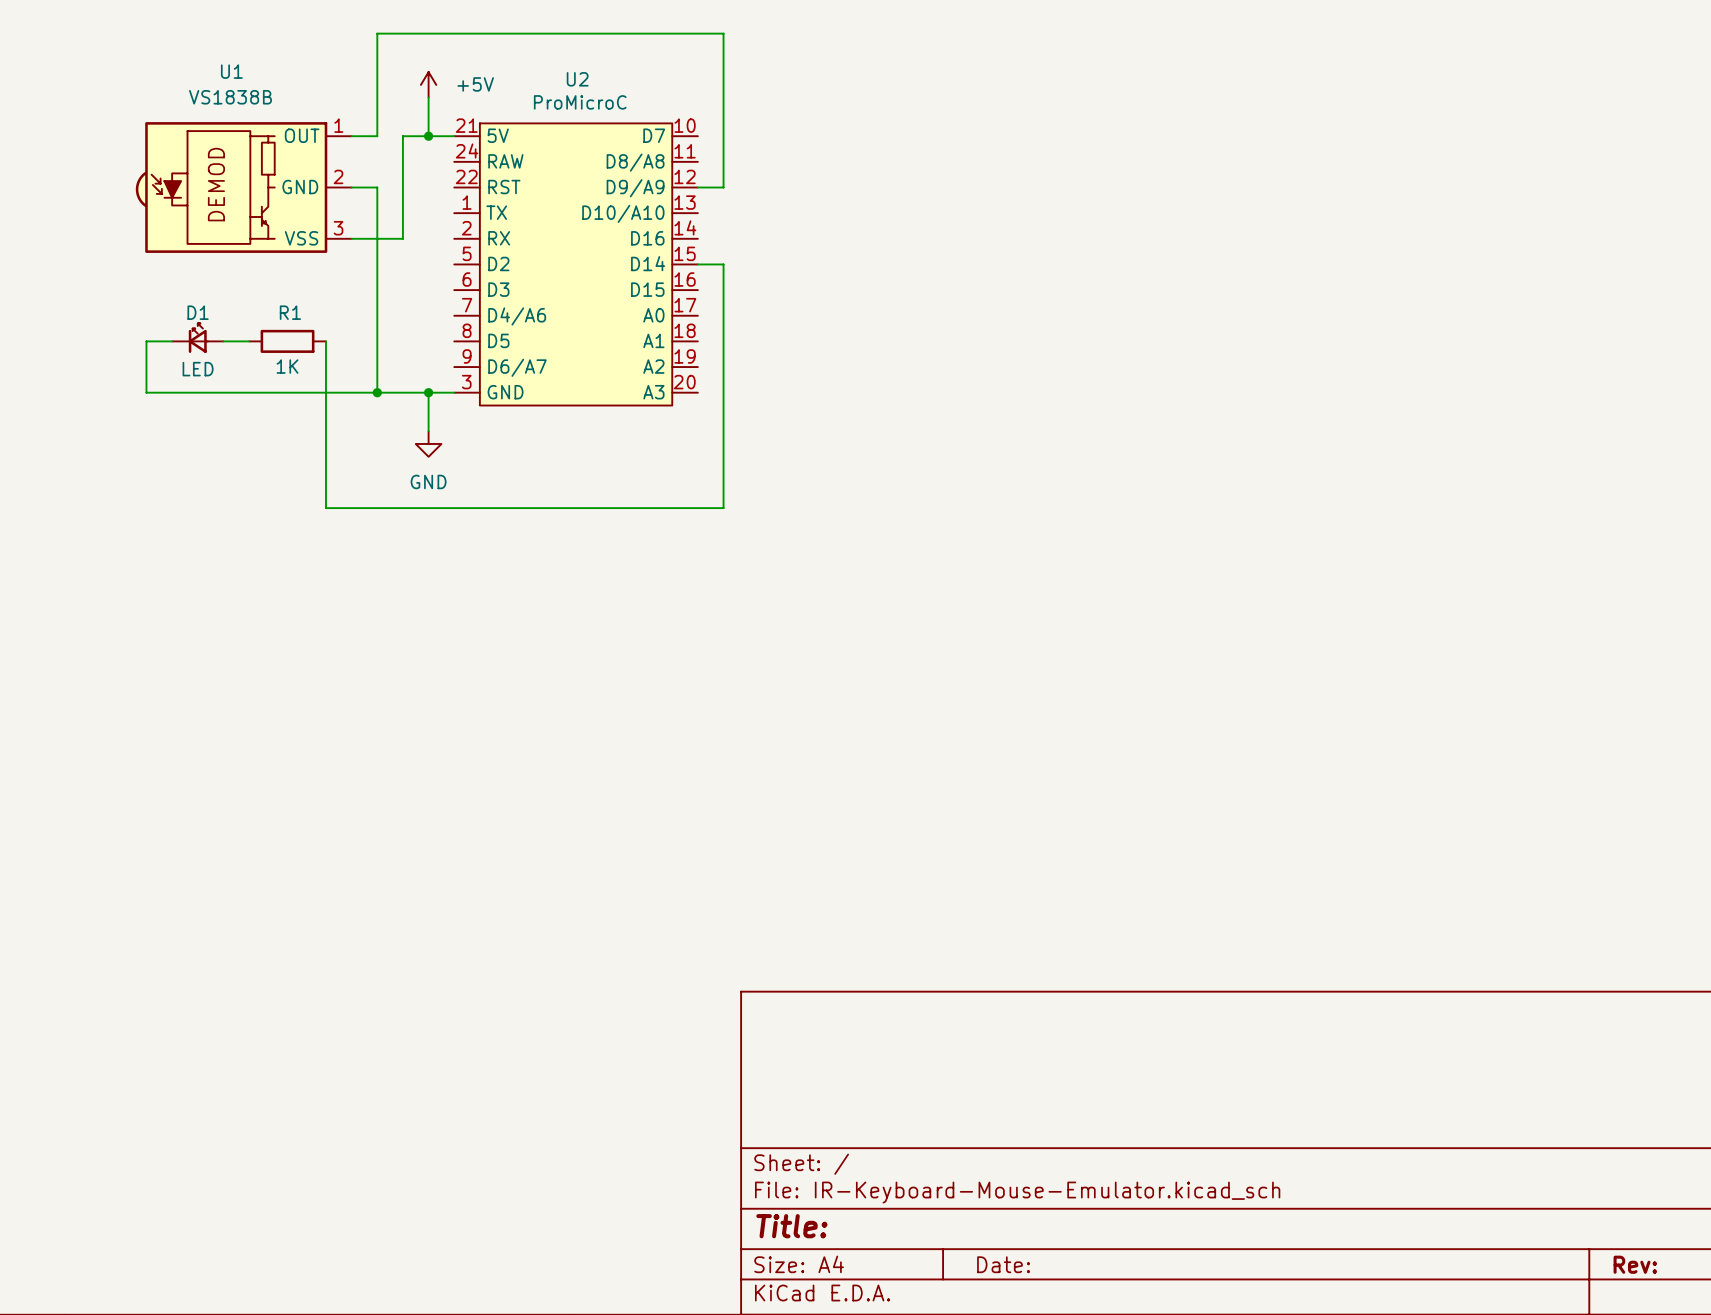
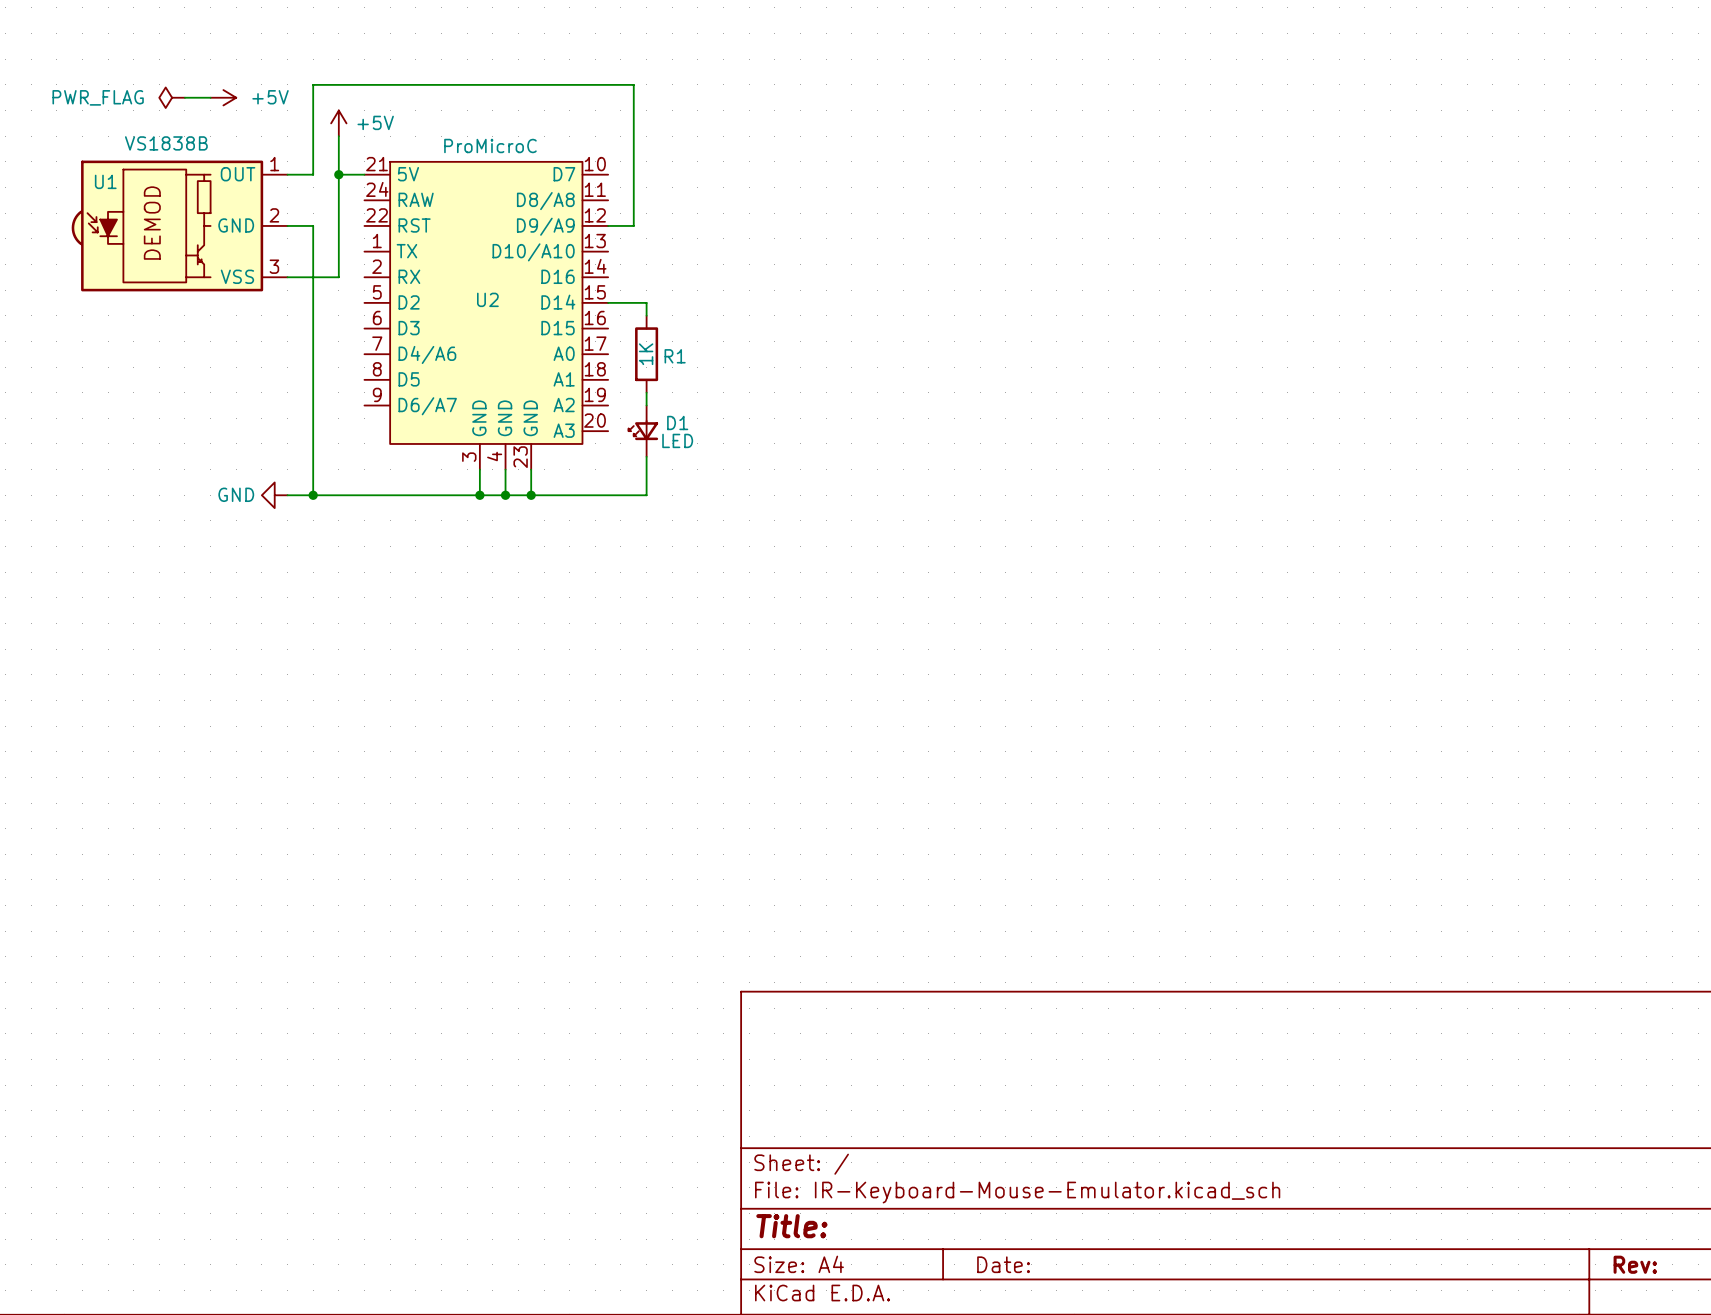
U1 name position: U1 (231, 71) -> U1 (105, 181)
U2 name position: U2 (577, 79) -> U2 (487, 299)
power symbol position: +5V (428, 84) -> +5V (338, 123)
power symbol text position: +5V (475, 84) -> +5V (375, 122)
power symbol: none -> PWR_FLAG (172, 97)
wire: none -> (184, 97) (210, 97)
power symbol: none -> +5V (223, 97)
U1 value position: VS1838B (230, 97) -> VS1838B (166, 143)
wire: (428, 97) (428, 136) -> none
U2 symbol: [454, 123, 698, 406] -> [364, 161, 609, 470]
wire: none -> (338, 136) (338, 277) (287, 277)
wire: (351, 136) (377, 136) (377, 33) (723, 33) (723, 187) (697, 187) -> none
junction: (428, 136) -> none
wire: (454, 136) (402, 136) (402, 238) (351, 238) -> none
wire: none -> (287, 174) (313, 174) (313, 84) (633, 84) (633, 225) (608, 225)
junction: none -> (338, 174)
U1 position: (243, 187) -> (179, 225)
wire: (351, 187) (377, 187) (377, 392) -> none
wire: none -> (287, 225) (313, 225) (313, 495)
wire: (697, 264) (723, 264) (723, 508) (326, 508) (326, 341) -> none
D1 name position: D1 (198, 312) -> D1 (677, 422)
D1 position: (197, 338) -> (643, 431)
D1 rotation: 0° (198, 338) -> 90° counterclockwise (643, 430)
wire: (172, 341) (146, 341) (146, 392) (454, 392) -> none
wire: (223, 341) (249, 341) -> (338, 174) (364, 174)
R1 rotation: 0° (287, 341) -> 90° clockwise (646, 354)
R1 position: (287, 341) -> (646, 354)
R1 value position: 1K (287, 366) -> 1K (646, 354)
junction: (377, 392) -> none
junction: (428, 392) -> none
power symbol rotation: 0° (428, 443) -> 90° clockwise (274, 495)
power symbol position: GND (428, 443) -> GND (274, 495)
wire: none -> (646, 456) (646, 495) (287, 495)
wire: none -> (479, 469) (479, 495)
wire: none -> (505, 469) (505, 495)
wire: none -> (531, 469) (531, 495)
junction: none -> (313, 495)
junction: none -> (479, 495)
junction: none -> (505, 495)
junction: none -> (531, 495)

